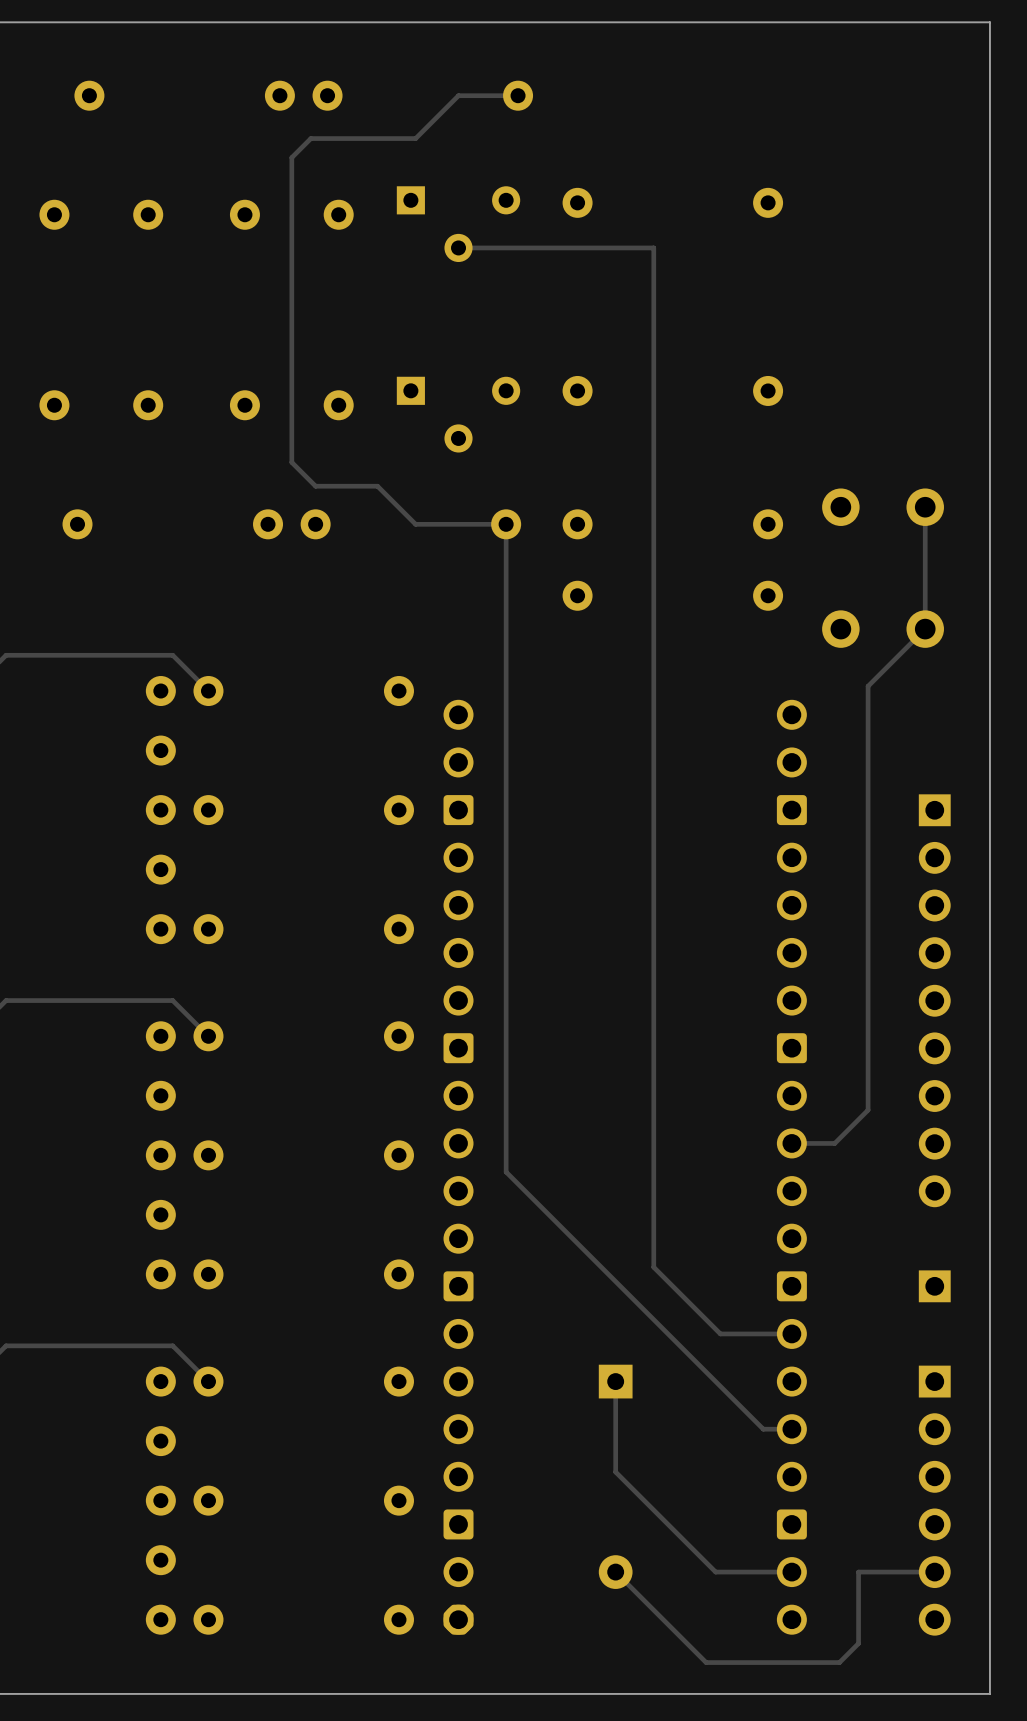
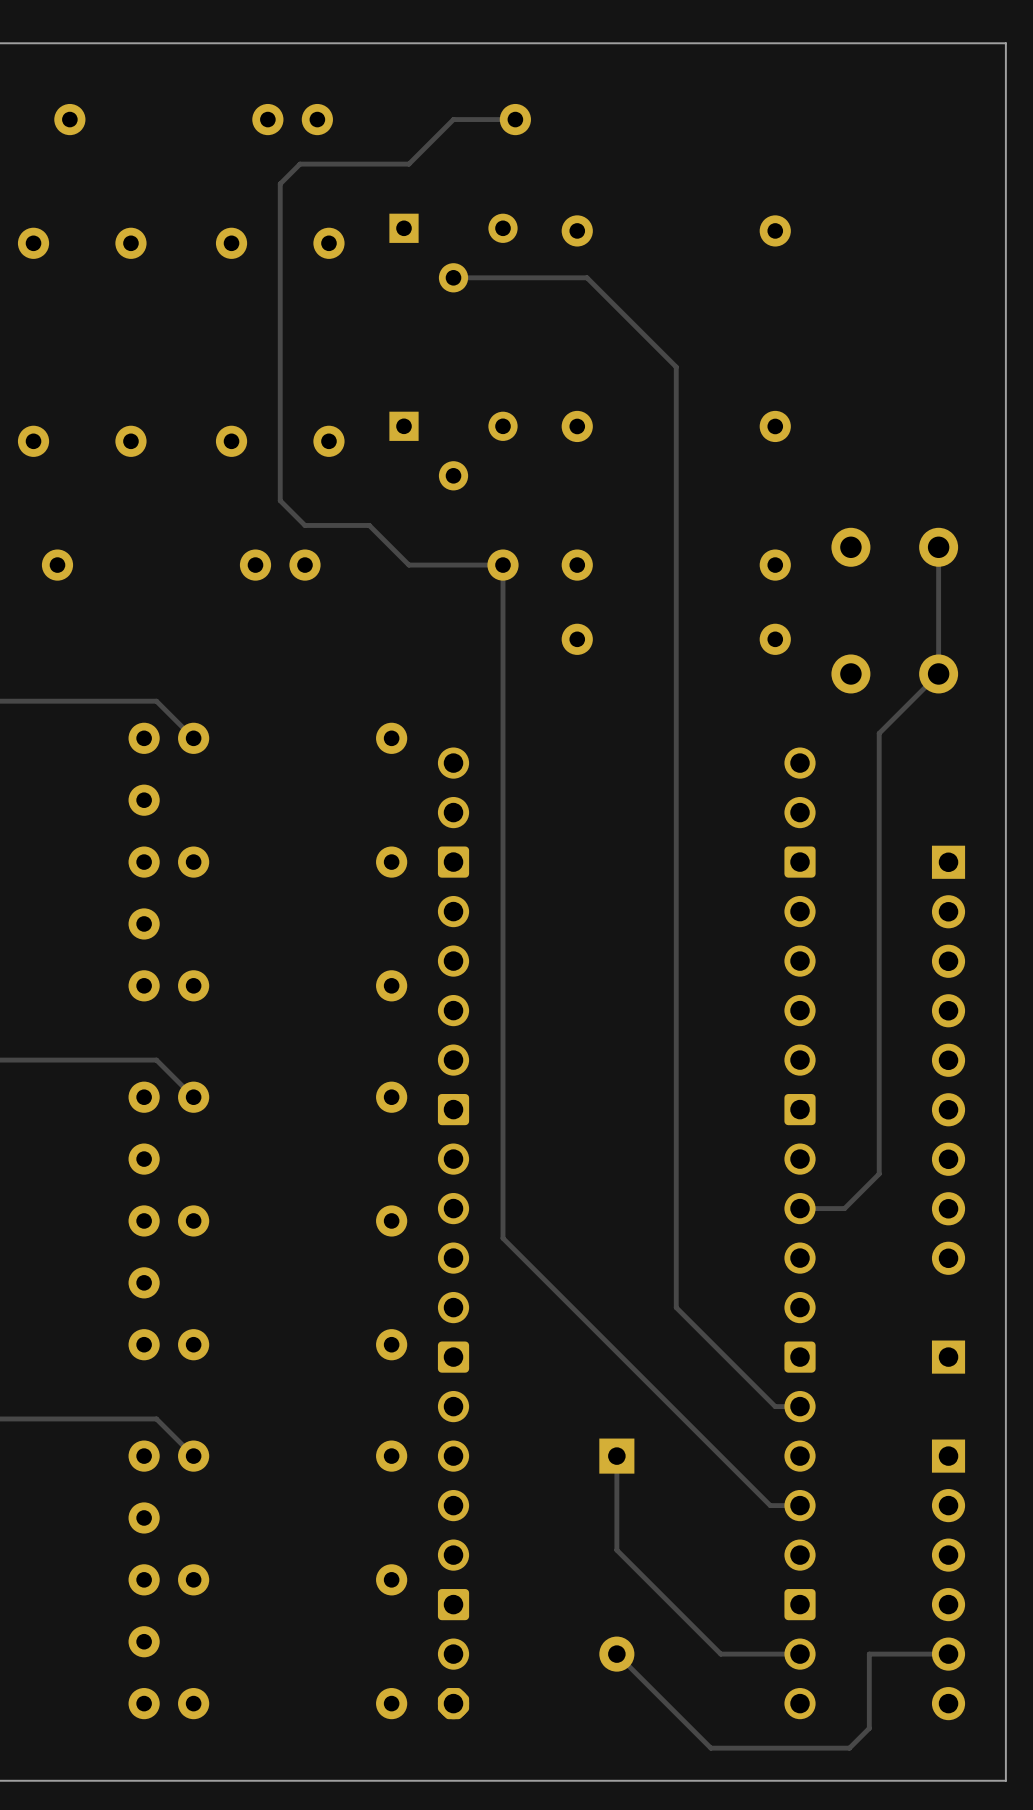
track: (653, 247) (586, 247) -> none
track: (653, 248) (653, 1267) (720, 1333) (768, 1333) -> (587, 277) (676, 367) (676, 1307) (775, 1406)

